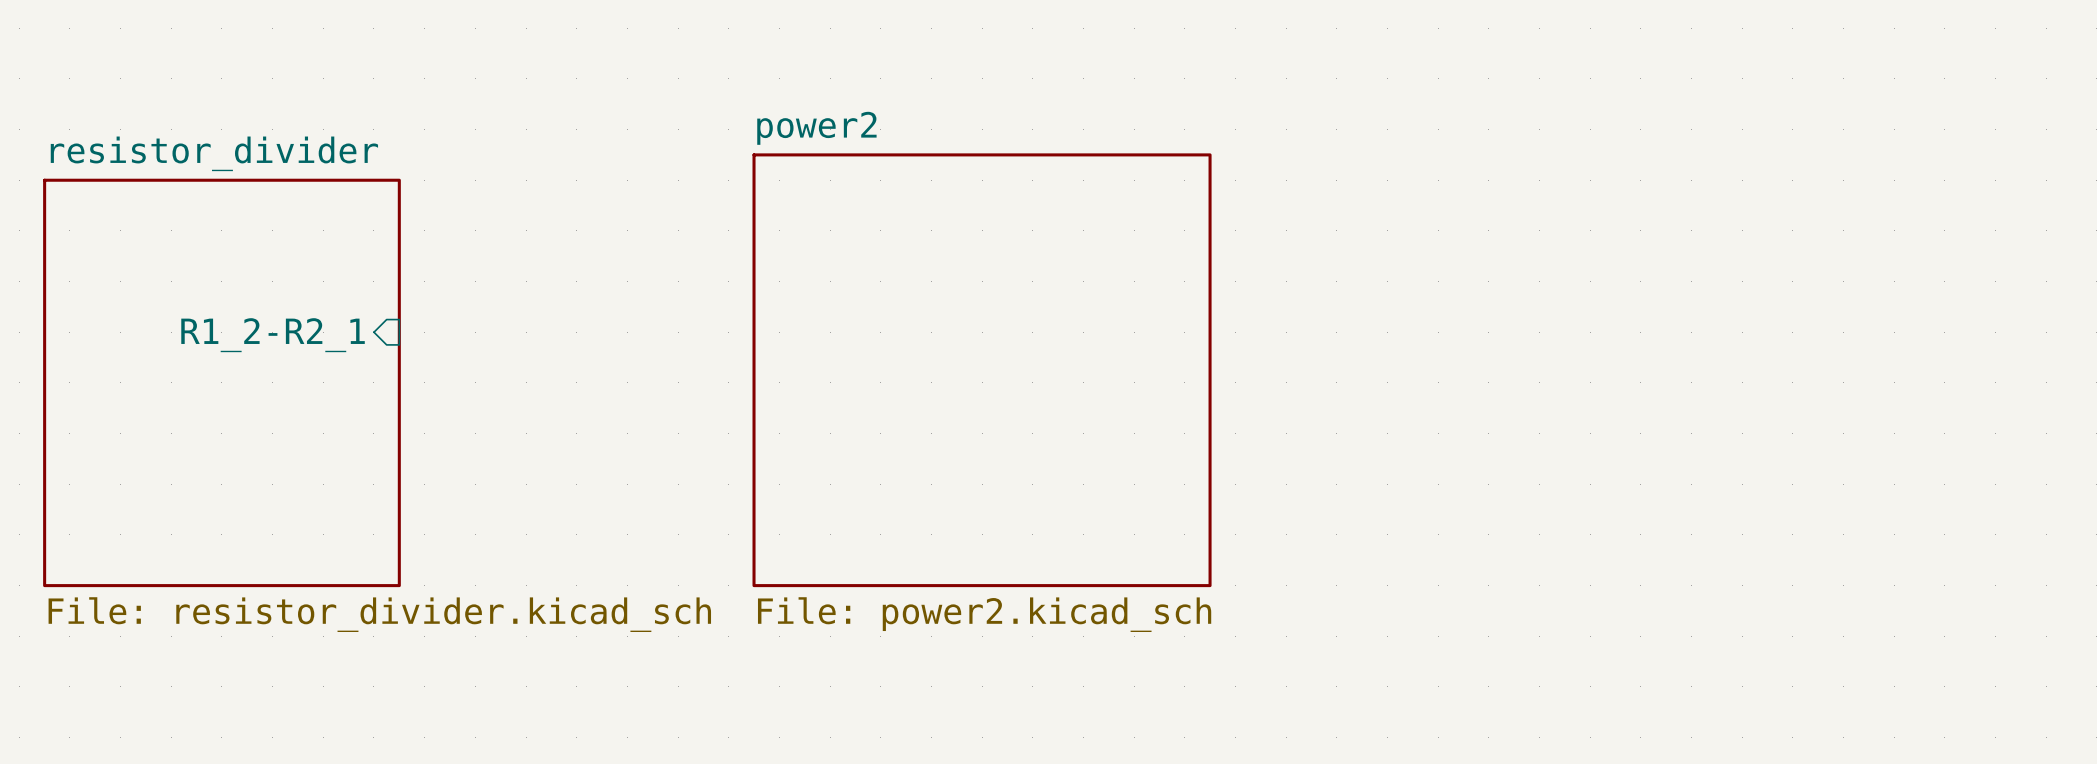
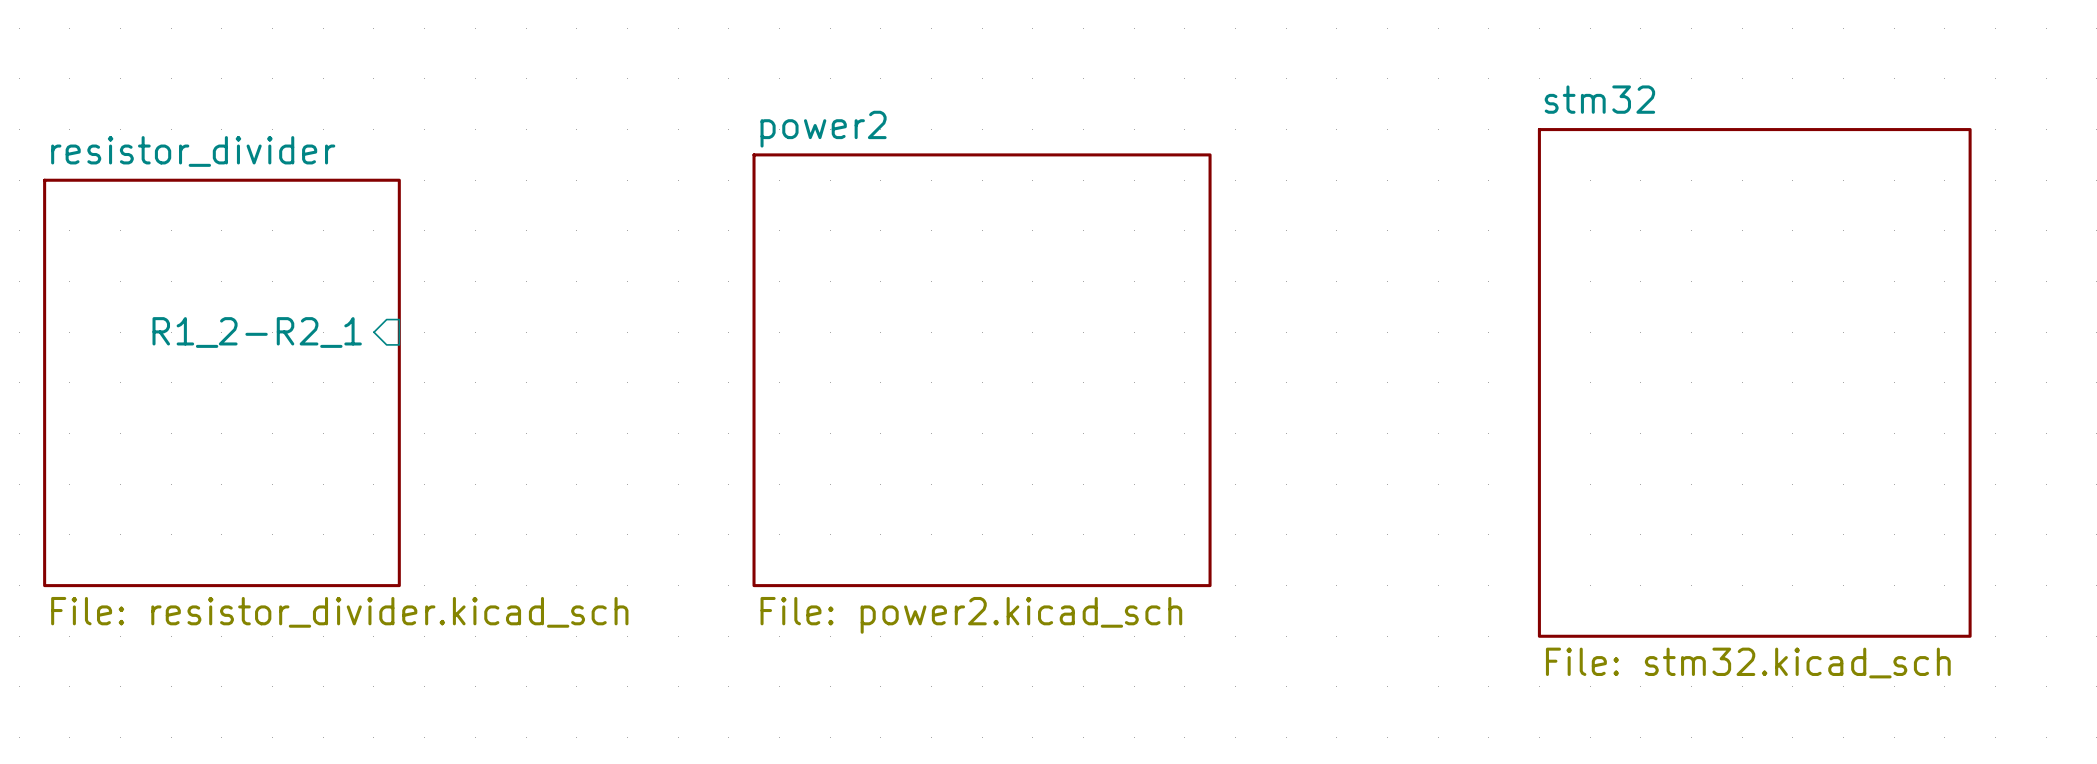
sheet stm32: none -> File: stm32.kicad_sch (1754, 382)

